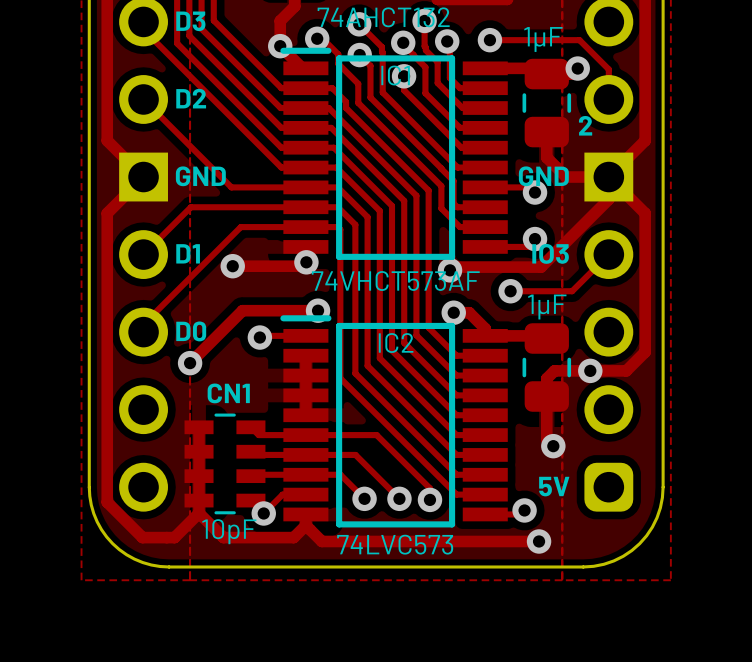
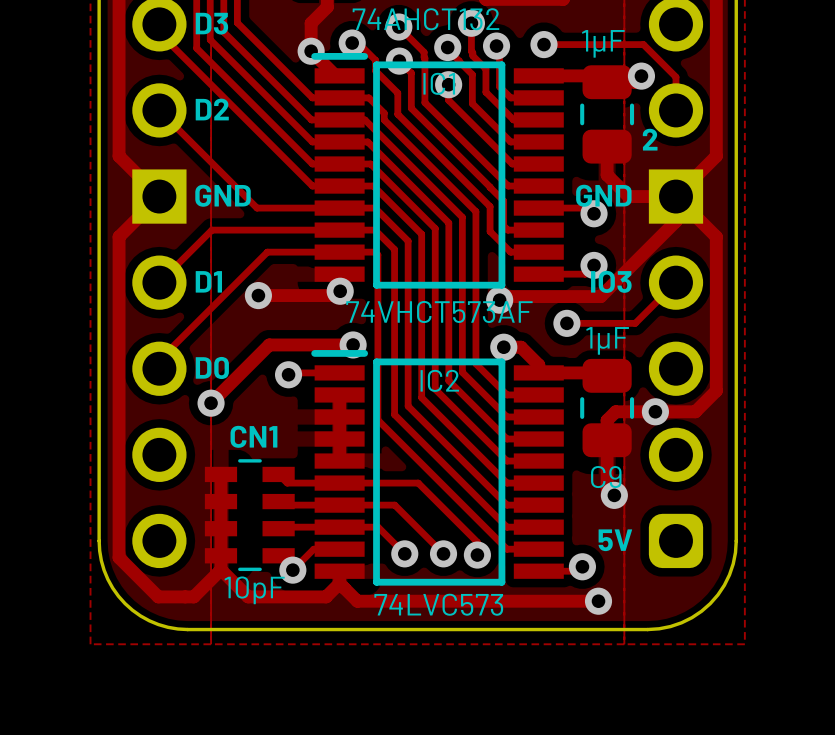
C9 name: none -> C9 (606, 477)

